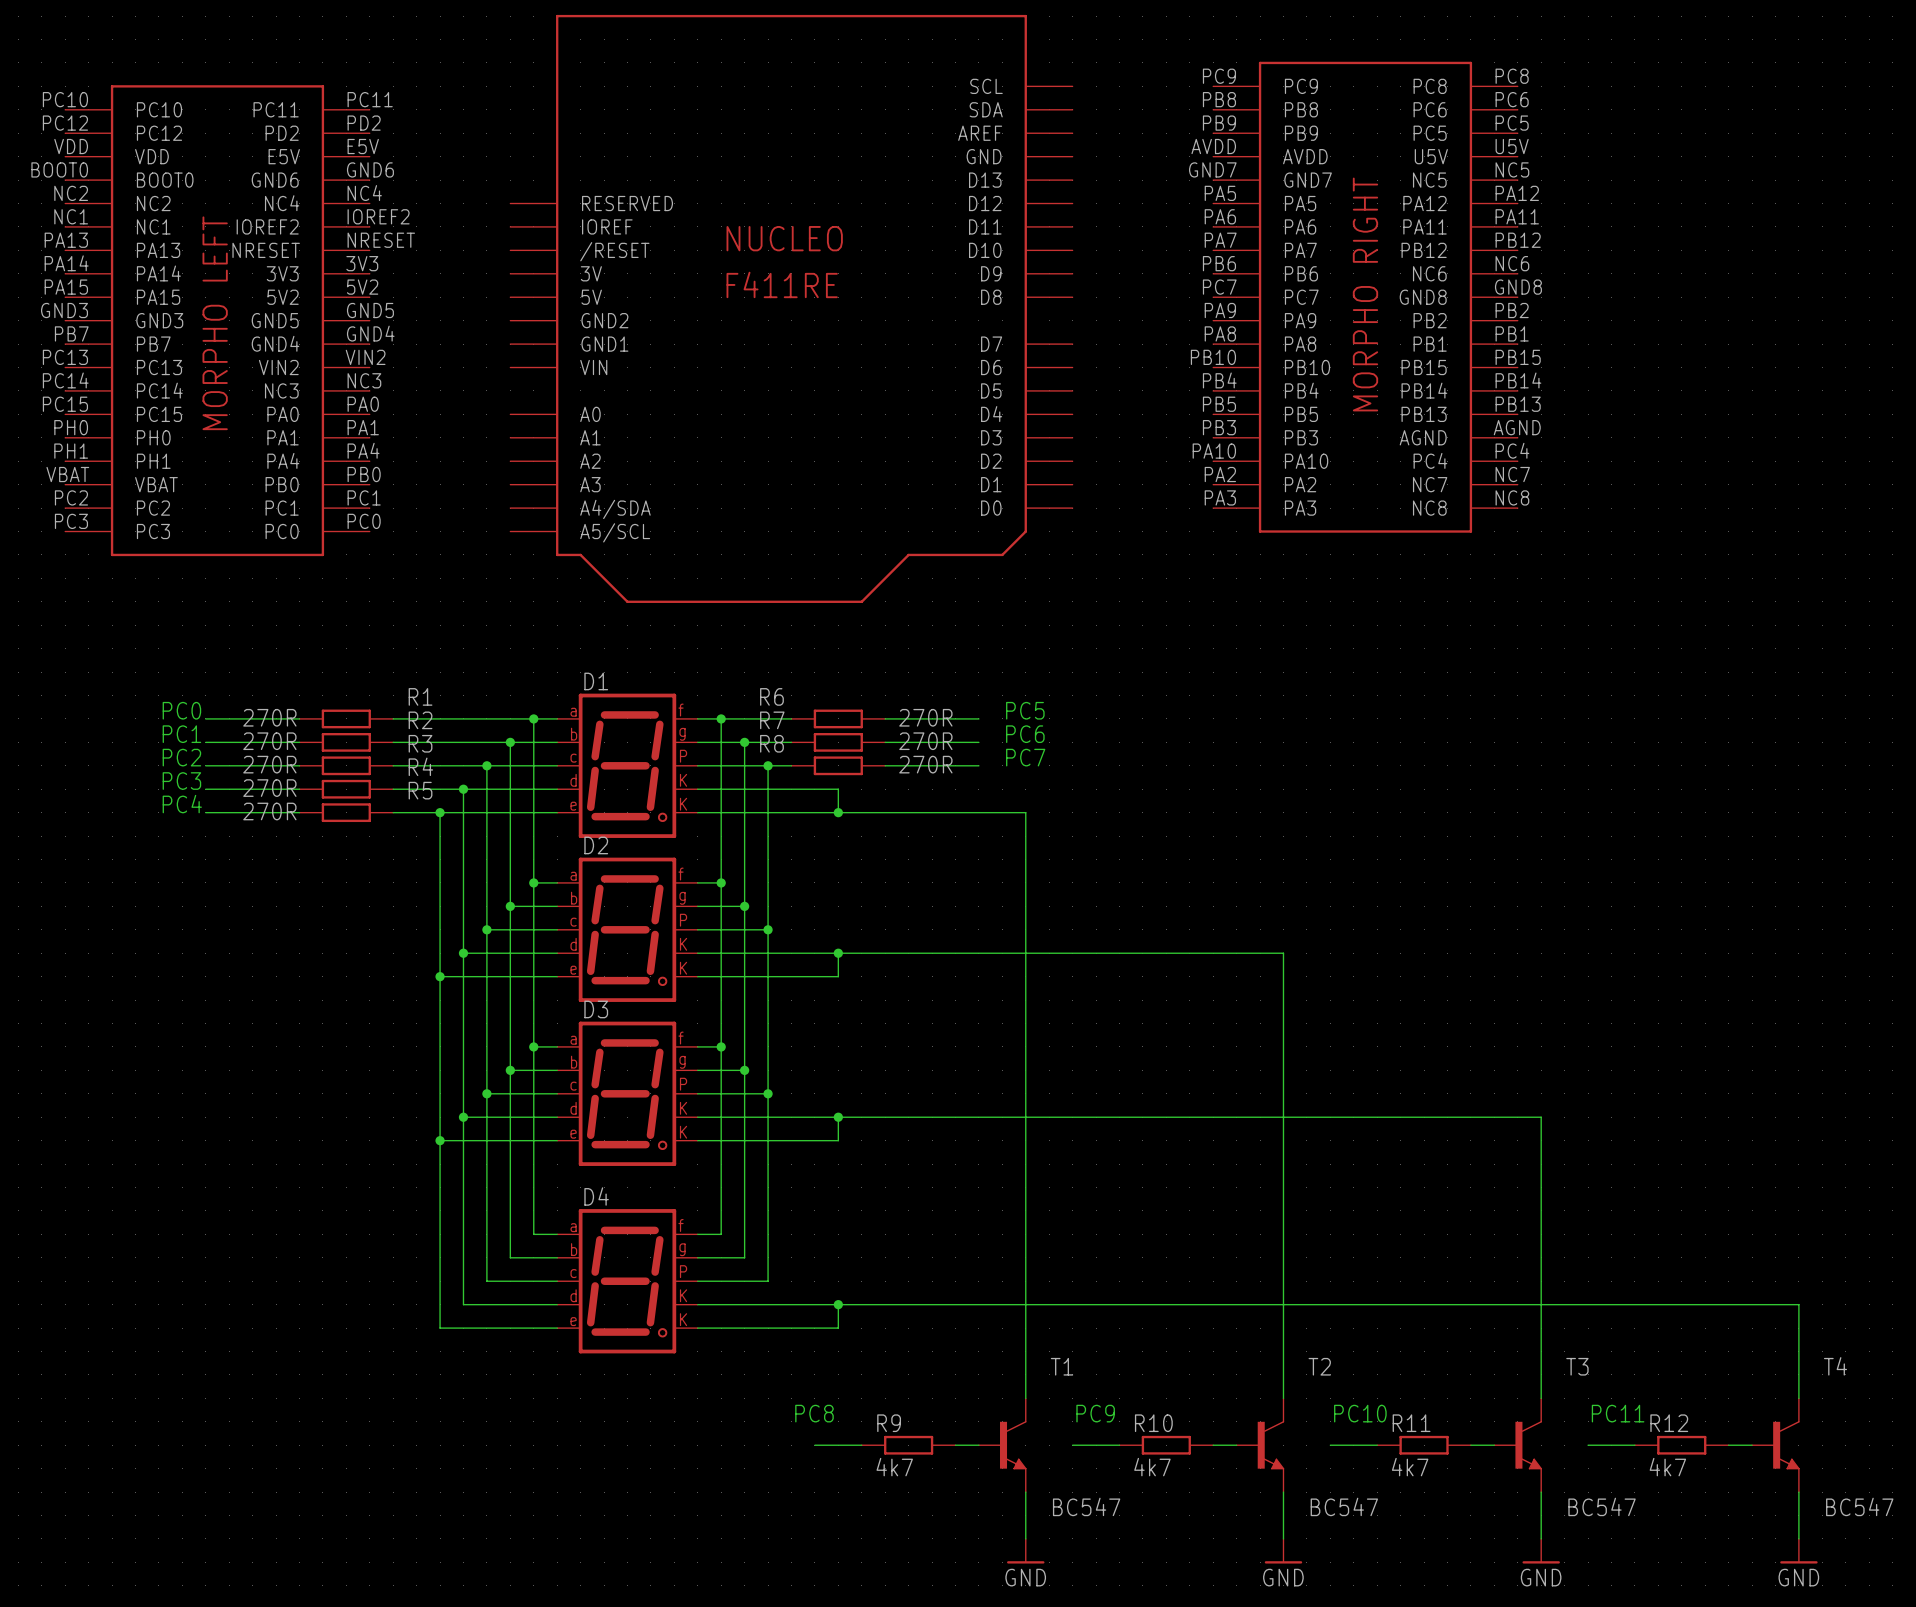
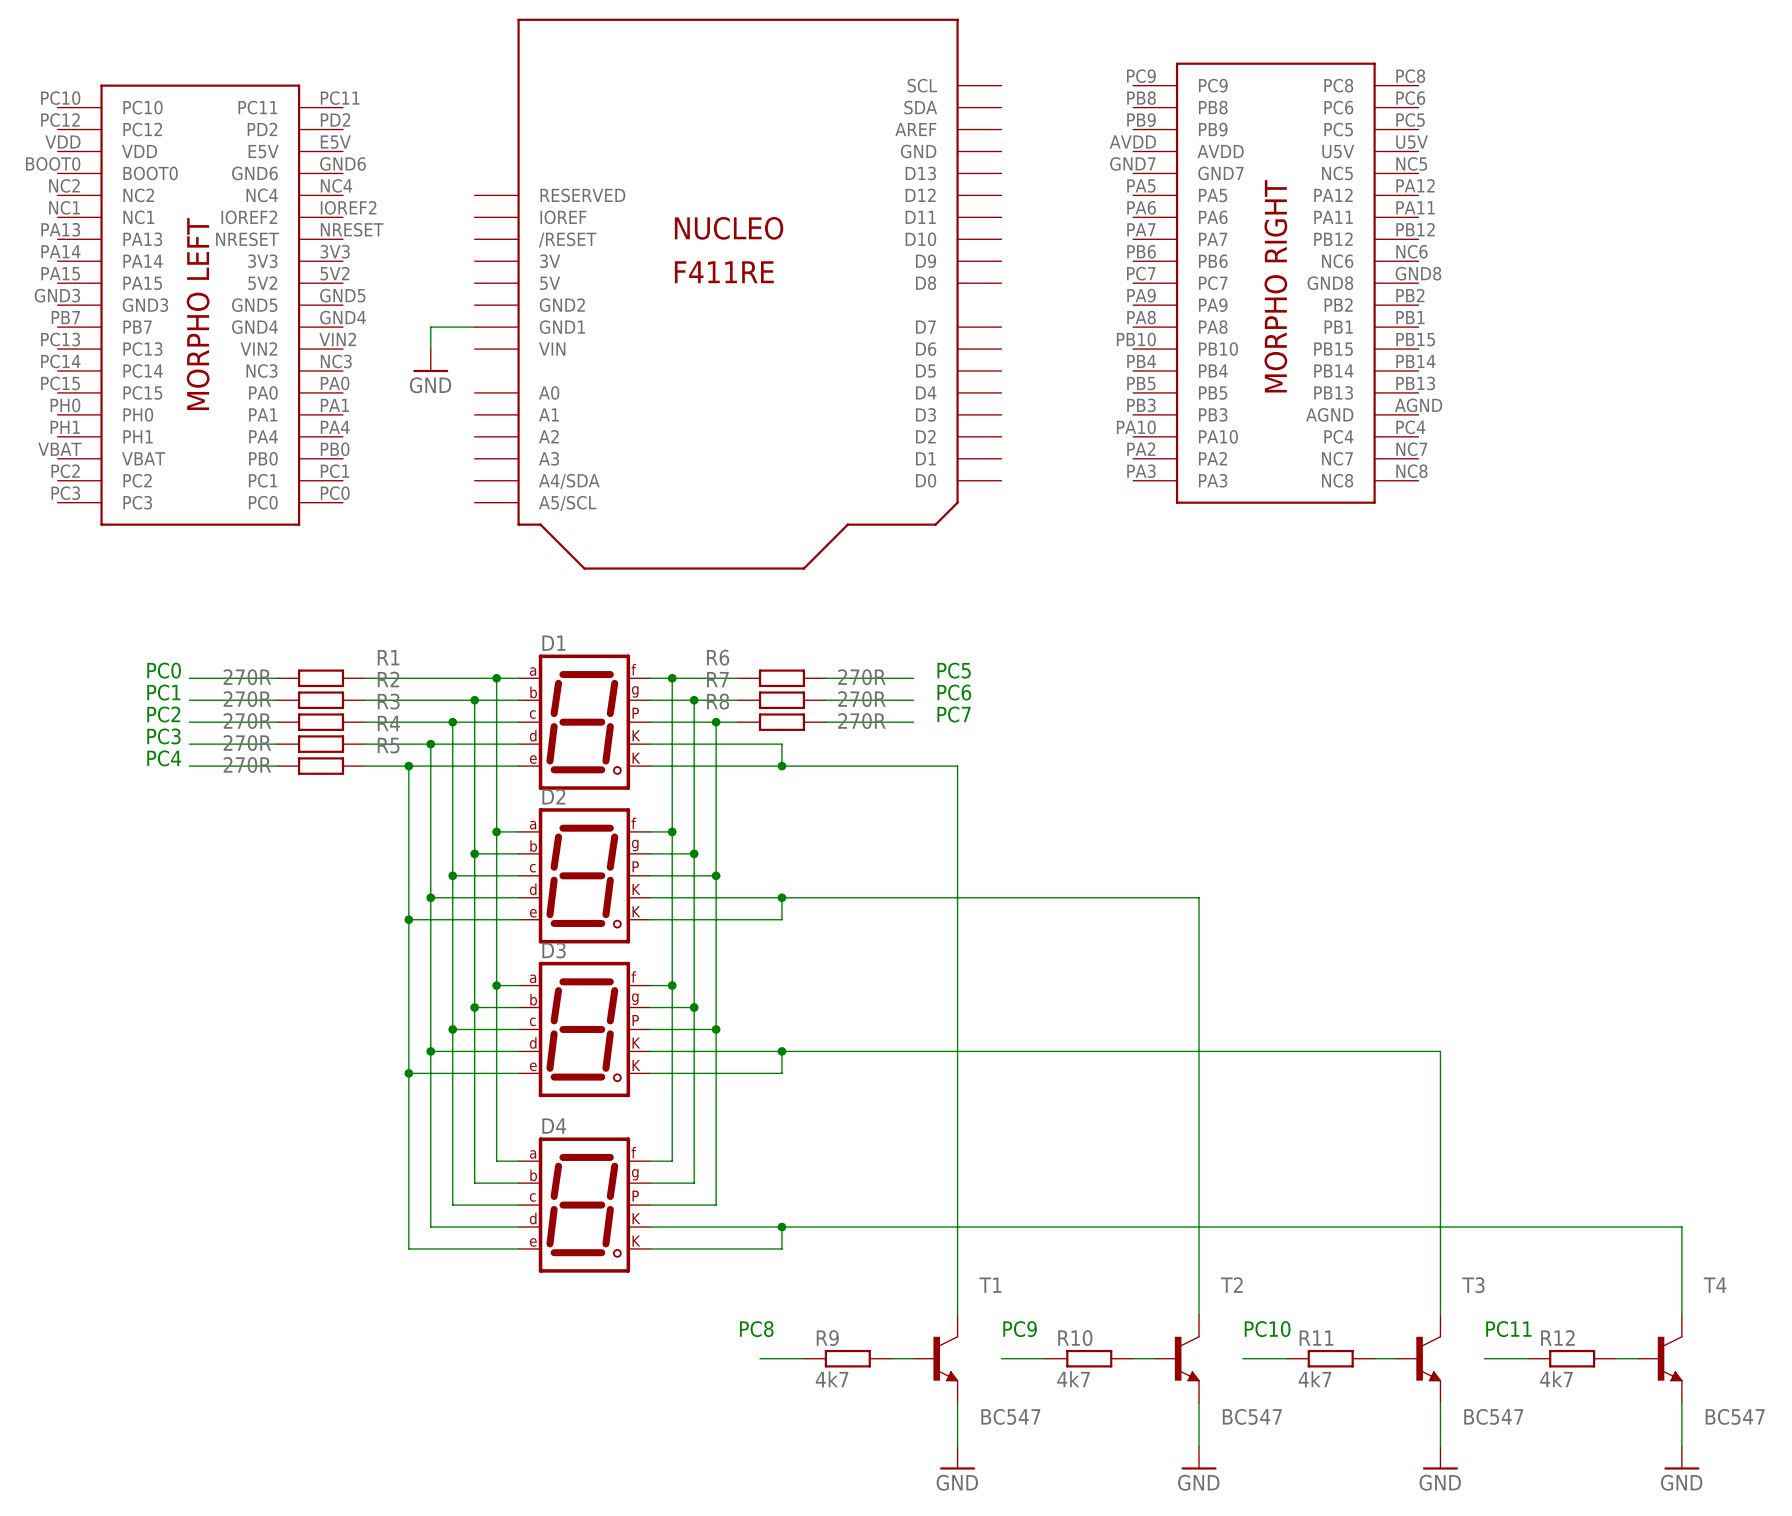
wire: none -> (474, 327) (430, 327) (430, 349)
power symbol: none -> GND (430, 360)

